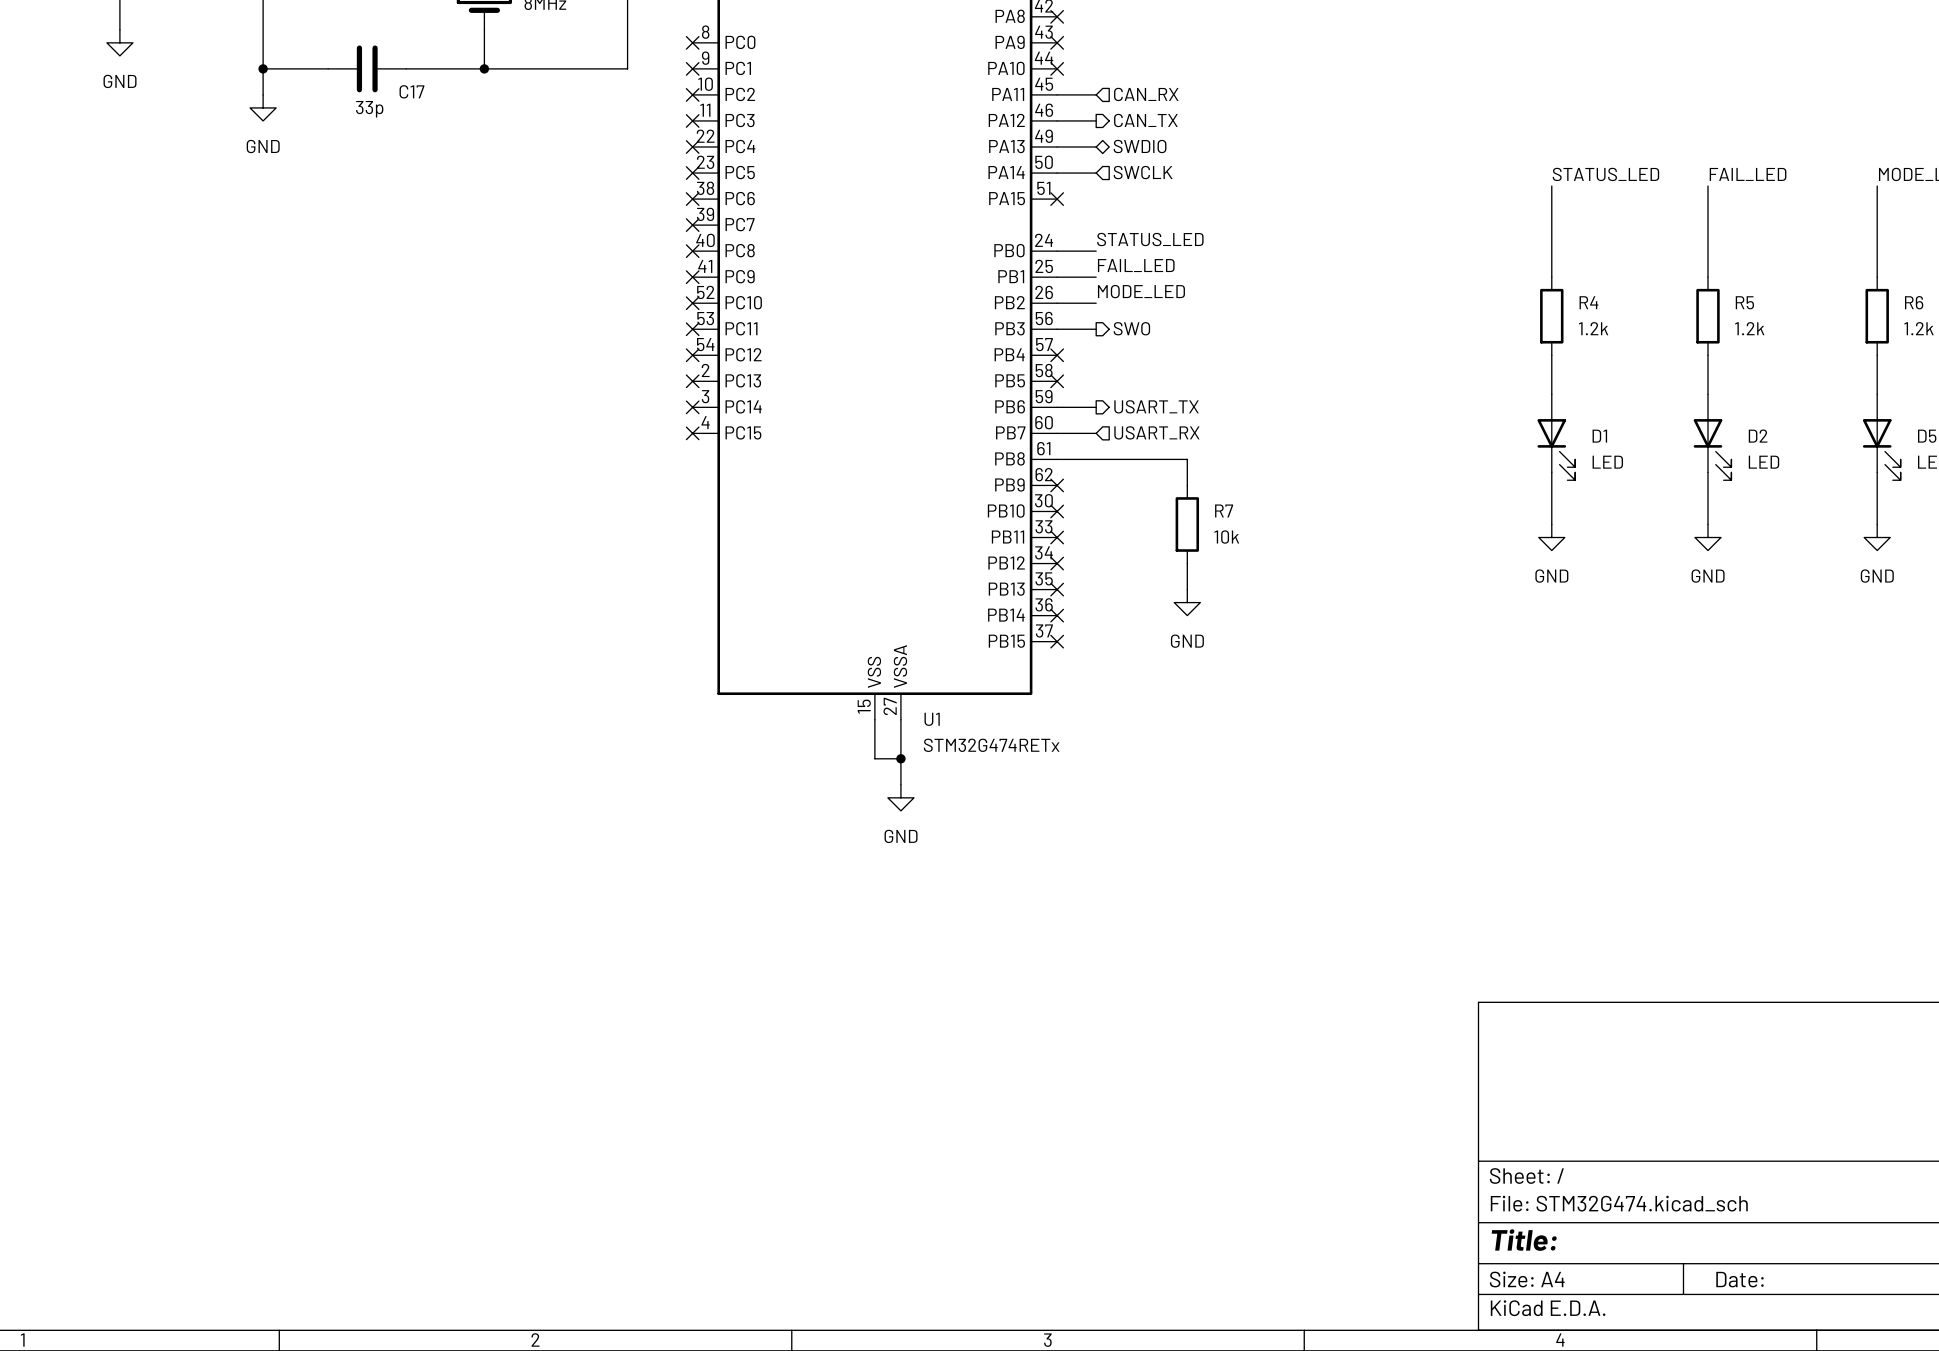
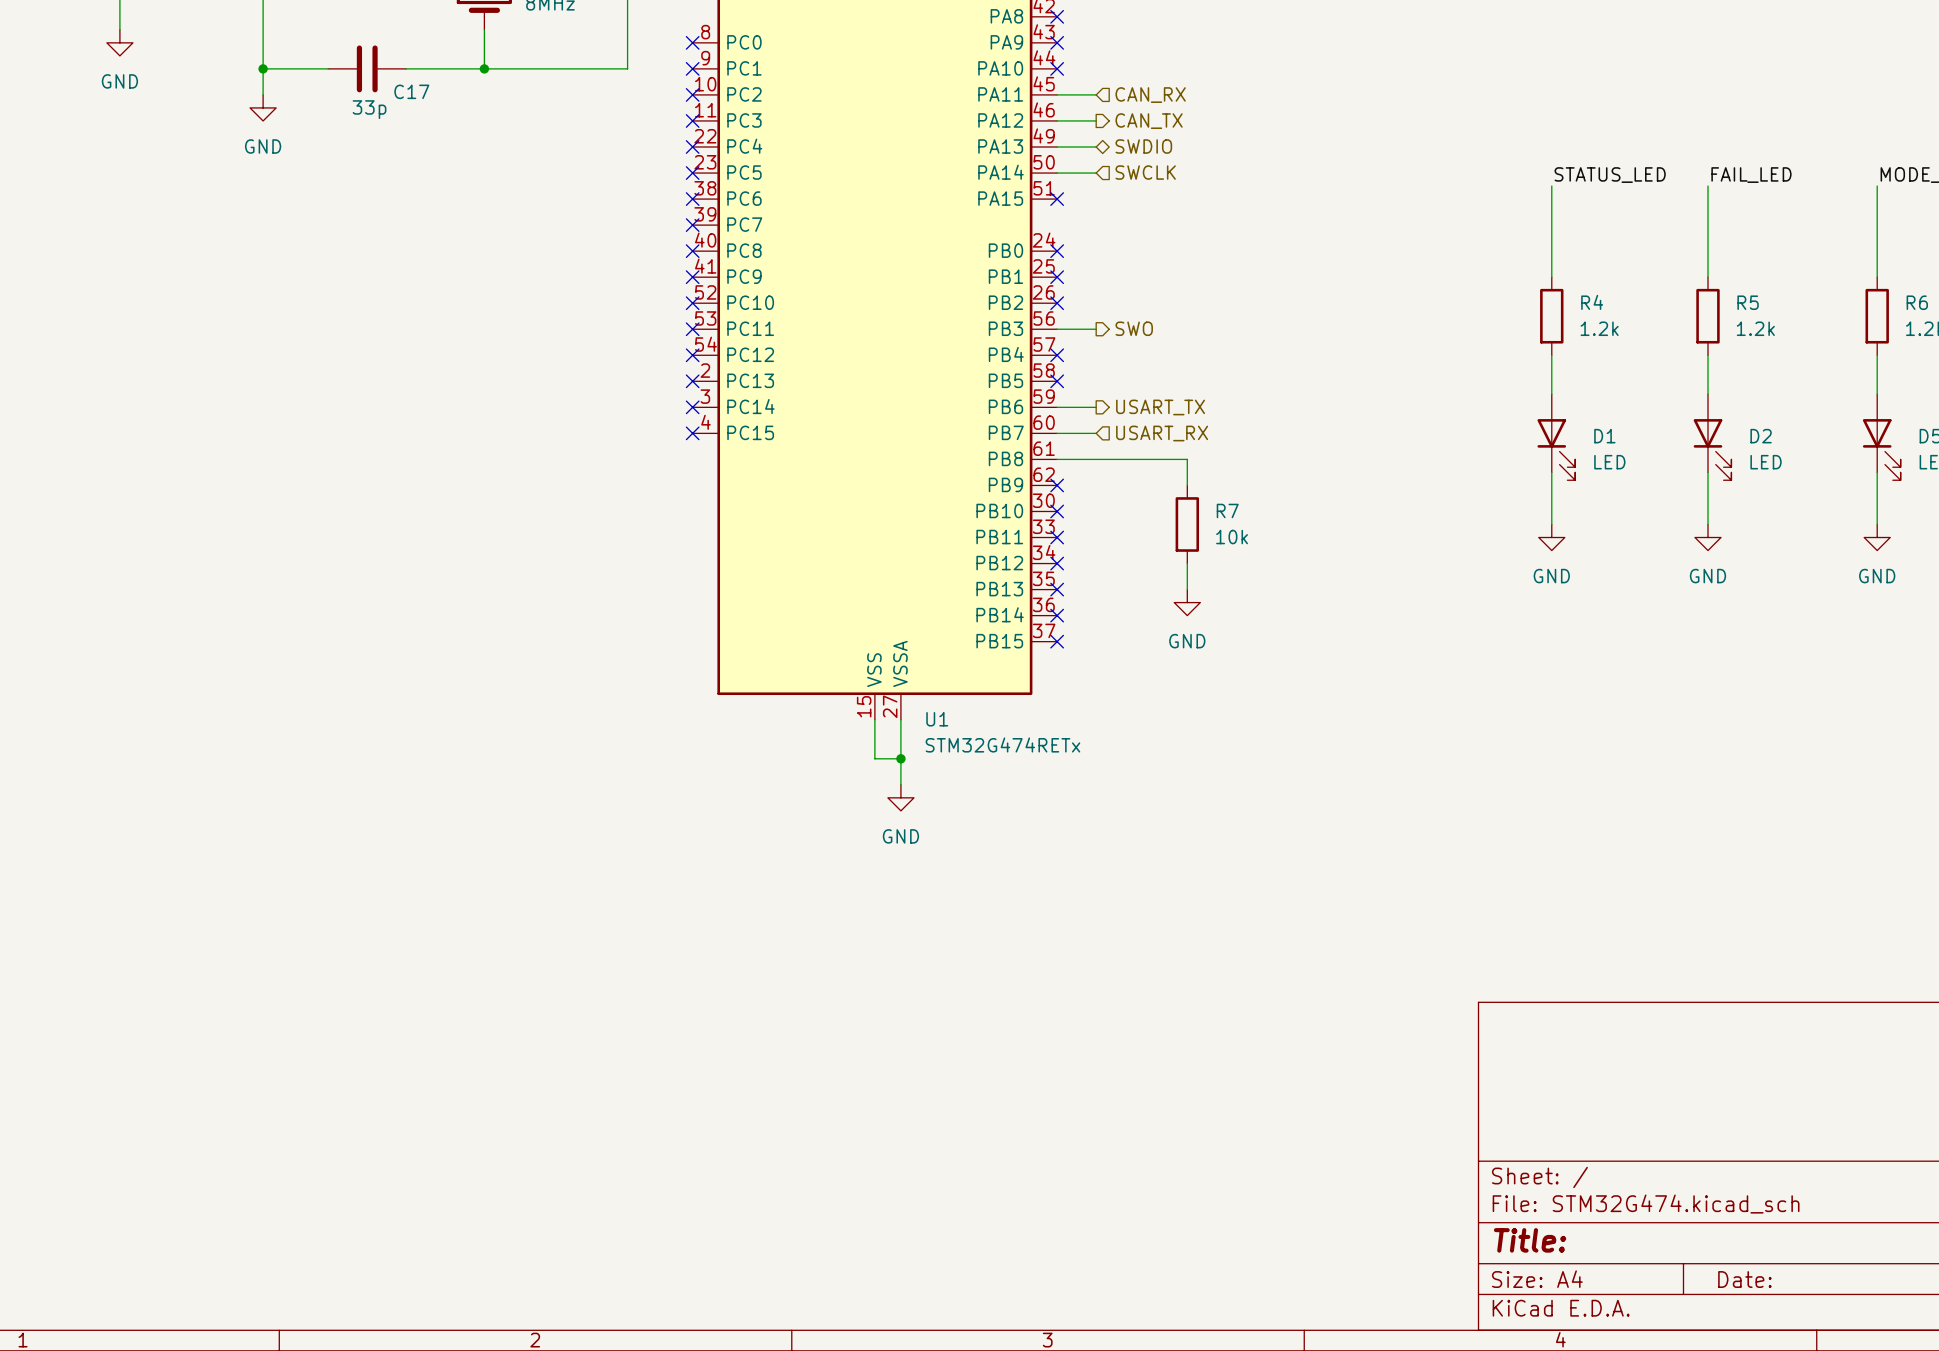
label: STATUS_LED (1150, 239) -> none
wire: (1057, 251) (1096, 251) -> none
no-connect mark: none -> (1057, 251)
label: FAIL_LED (1136, 265) -> none
wire: (1057, 277) (1096, 277) -> none
no-connect mark: none -> (1057, 277)
label: MODE_LED (1141, 291) -> none
wire: (1057, 303) (1096, 303) -> none
no-connect mark: none -> (1057, 303)

